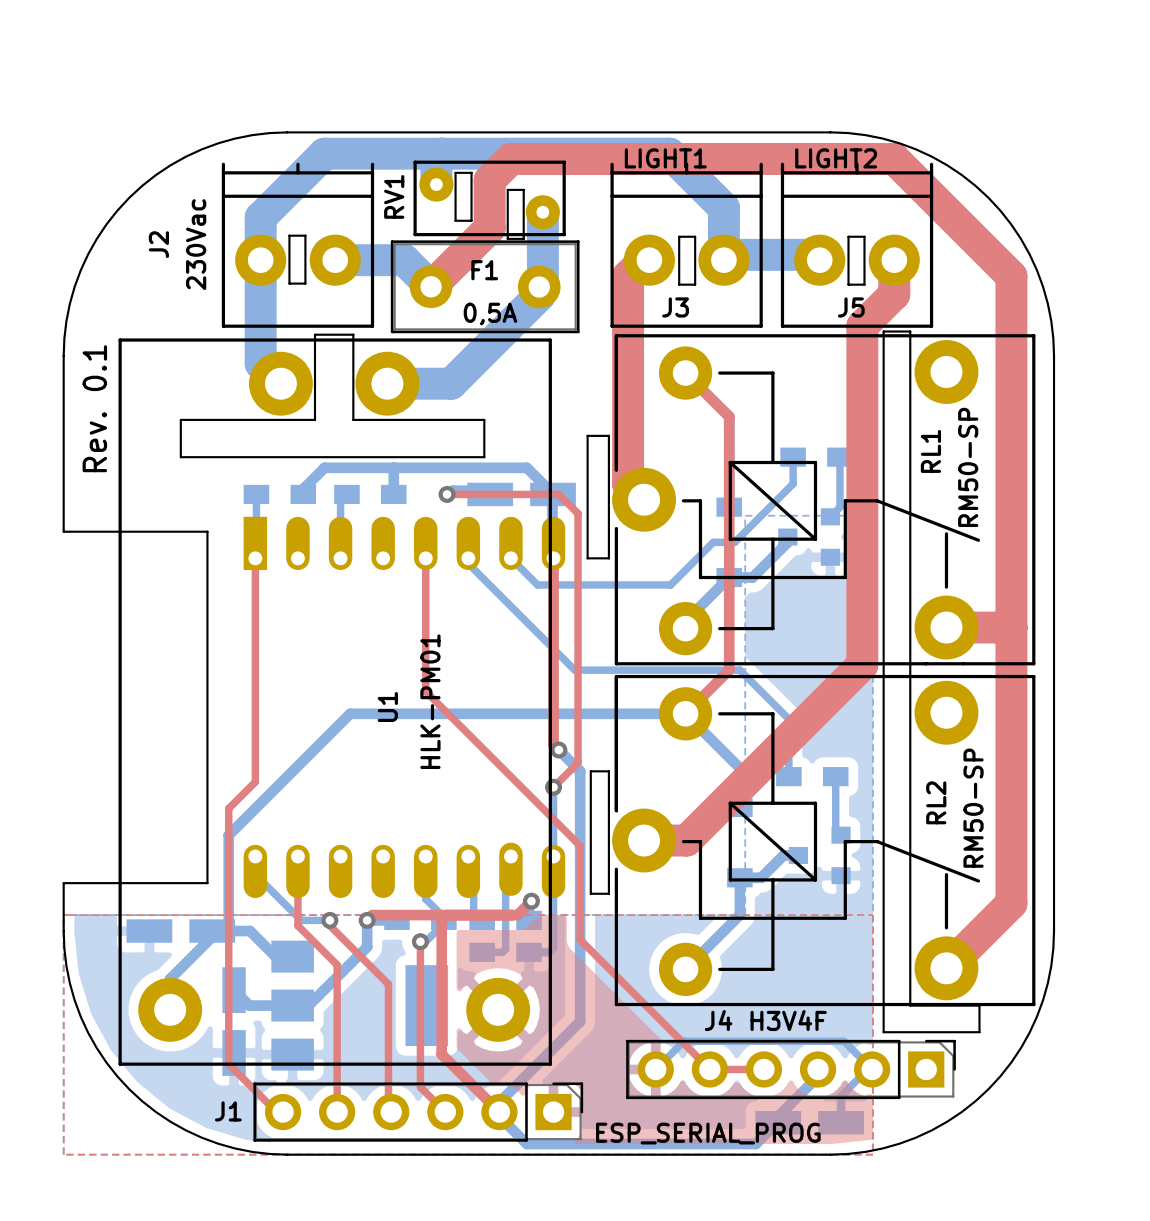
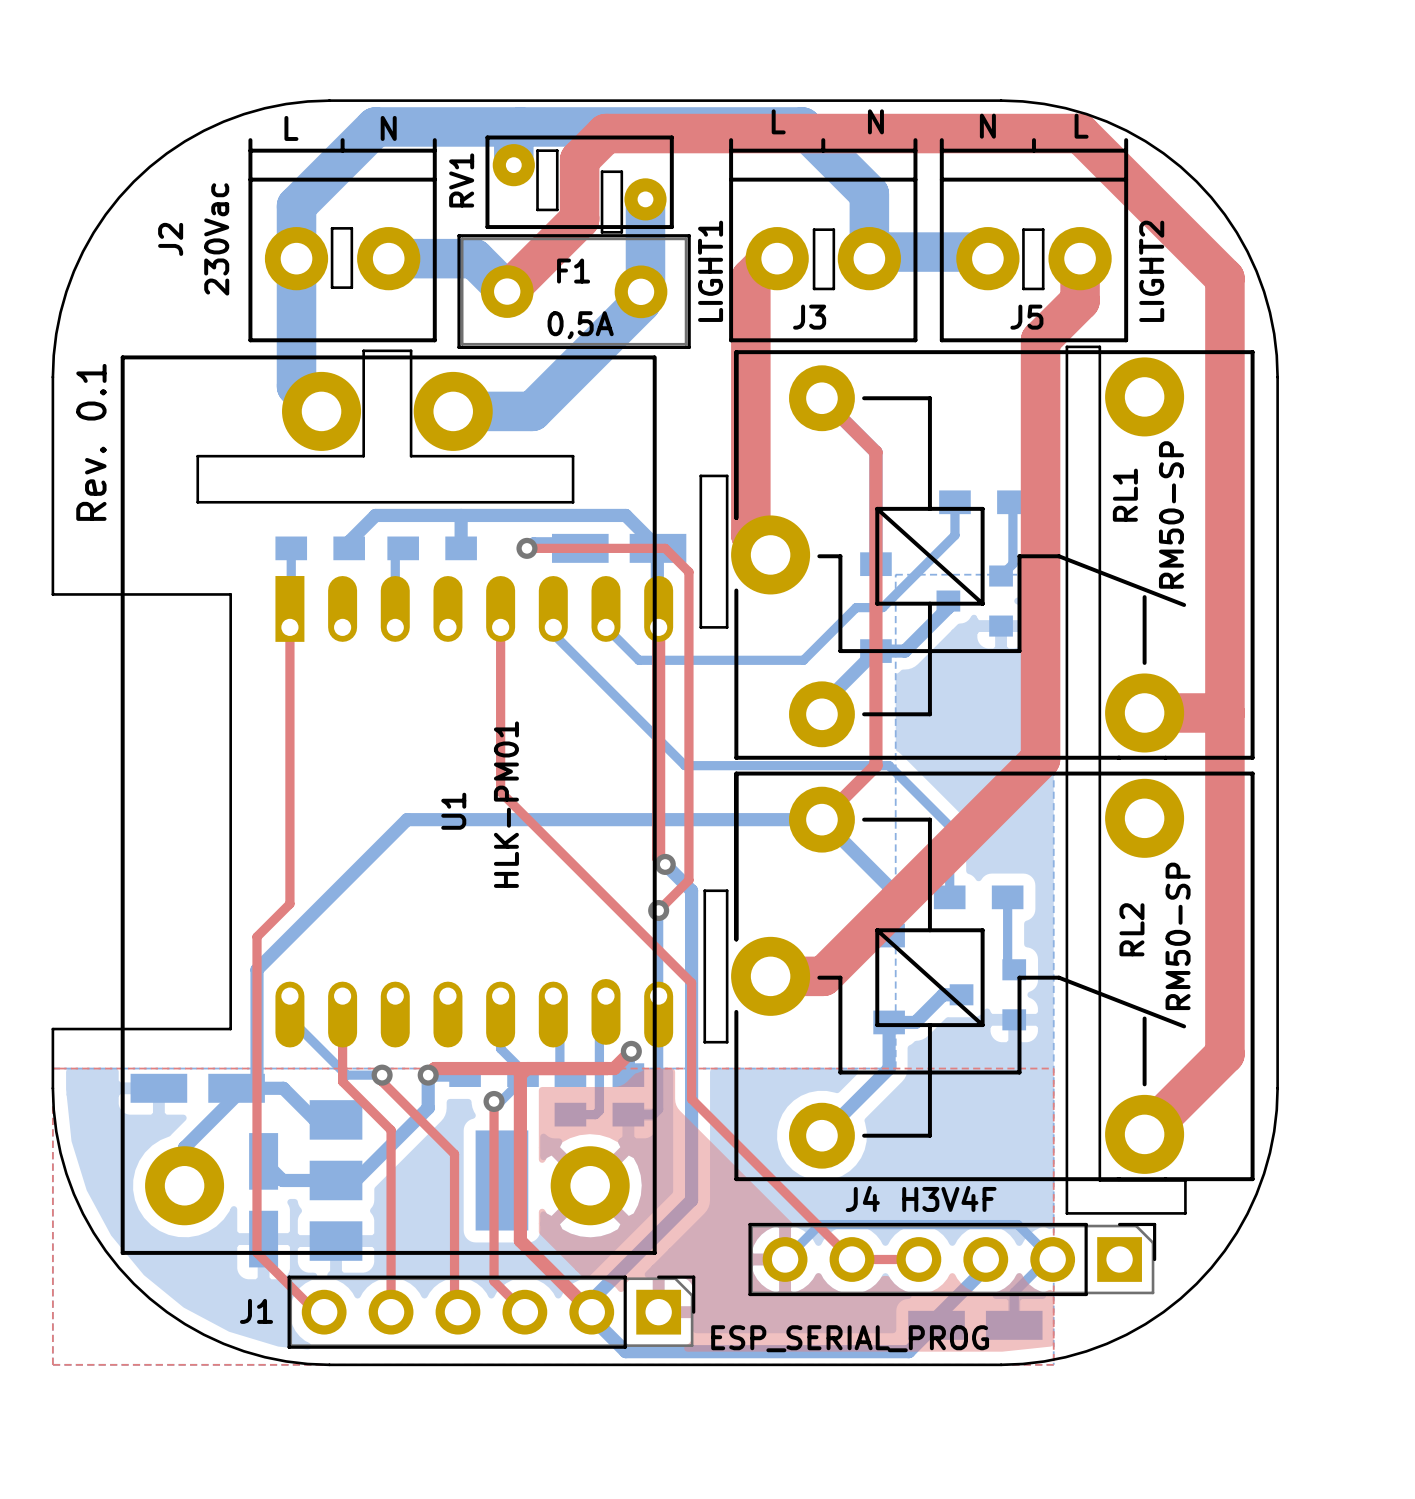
text: none -> L (778, 121)
text: none -> N (875, 121)
text: none -> N (987, 126)
text: none -> L (1081, 126)
text: none -> L (291, 128)
text: none -> N (388, 128)
J3 value rotation: 0° (665, 158) -> 90° counterclockwise (710, 271)
J3 value position: LIGHT1 (665, 158) -> LIGHT1 (710, 271)
J5 value rotation: 0° (836, 158) -> 90° counterclockwise (1151, 271)
J5 value position: LIGHT2 (836, 158) -> LIGHT2 (1151, 271)

